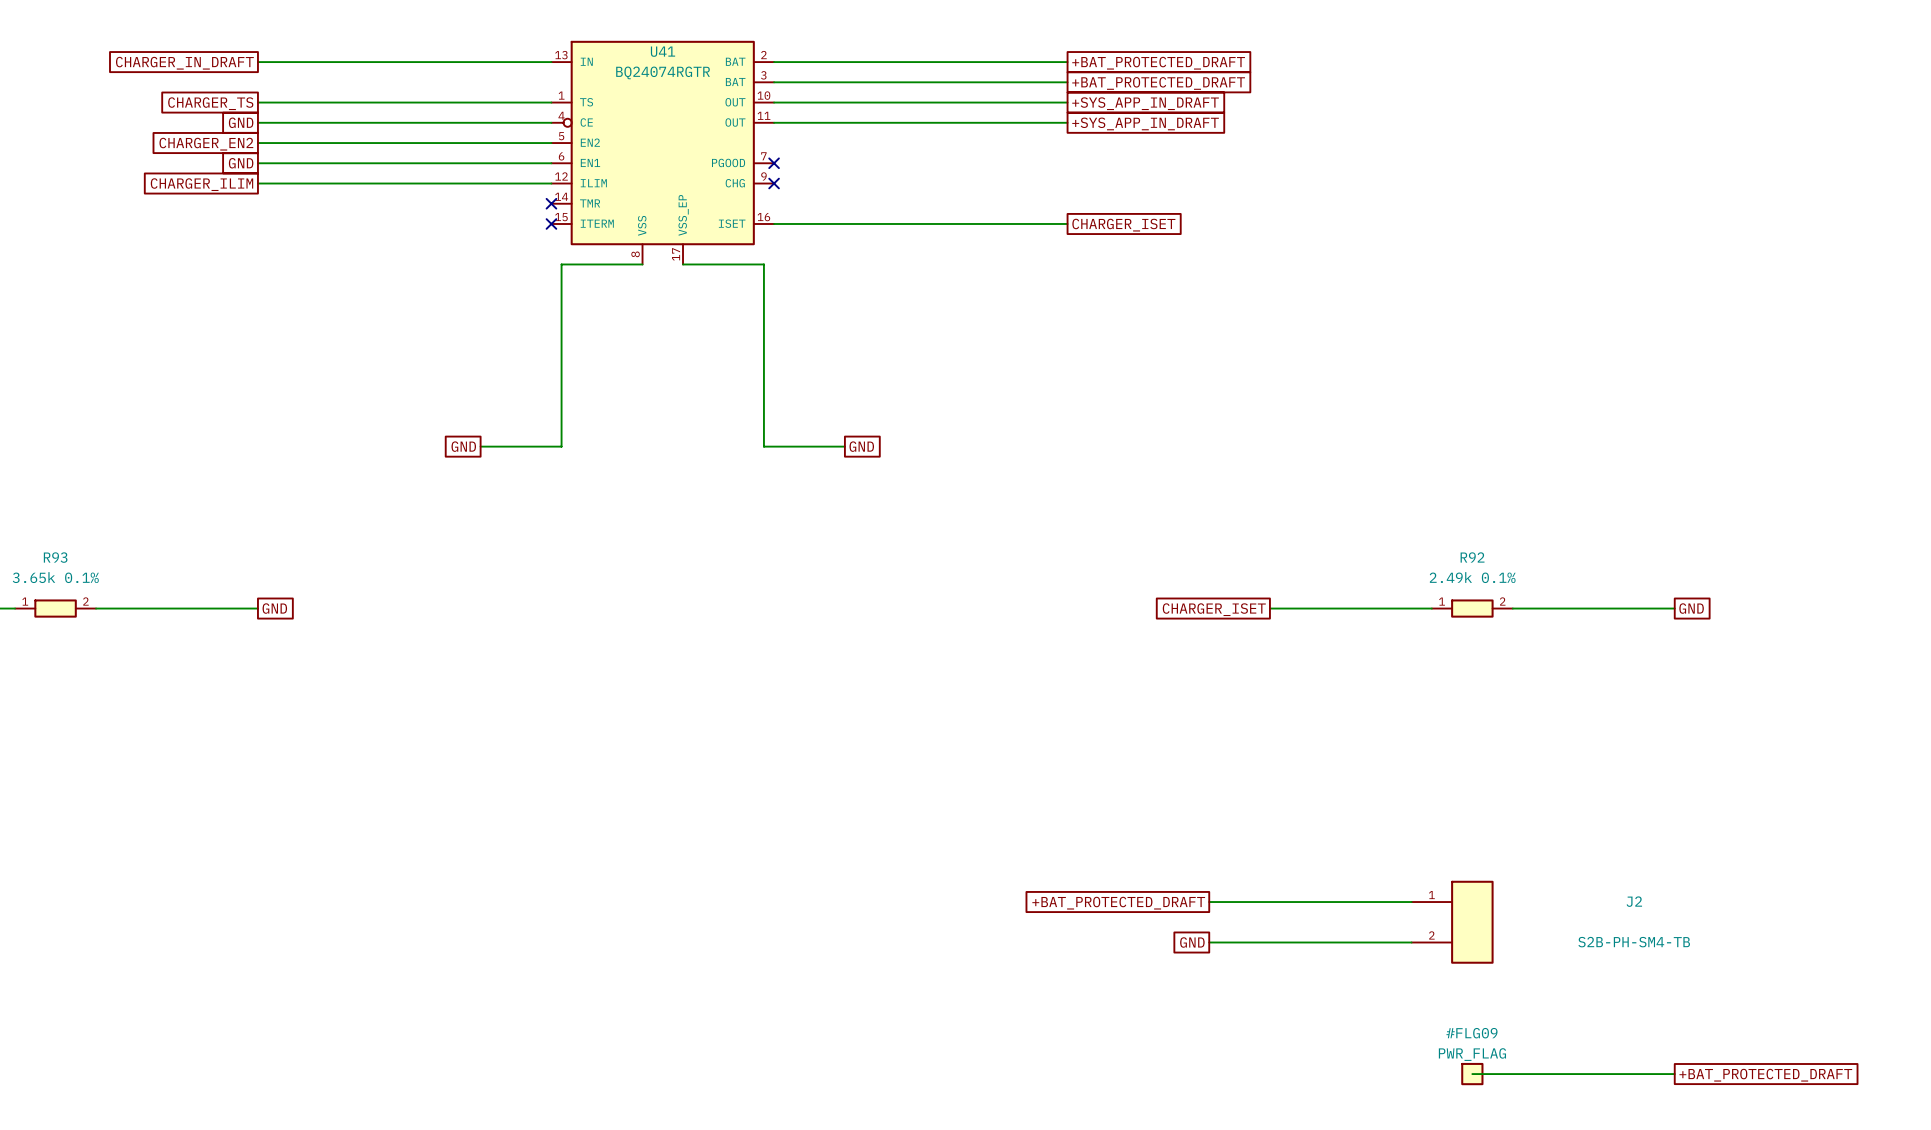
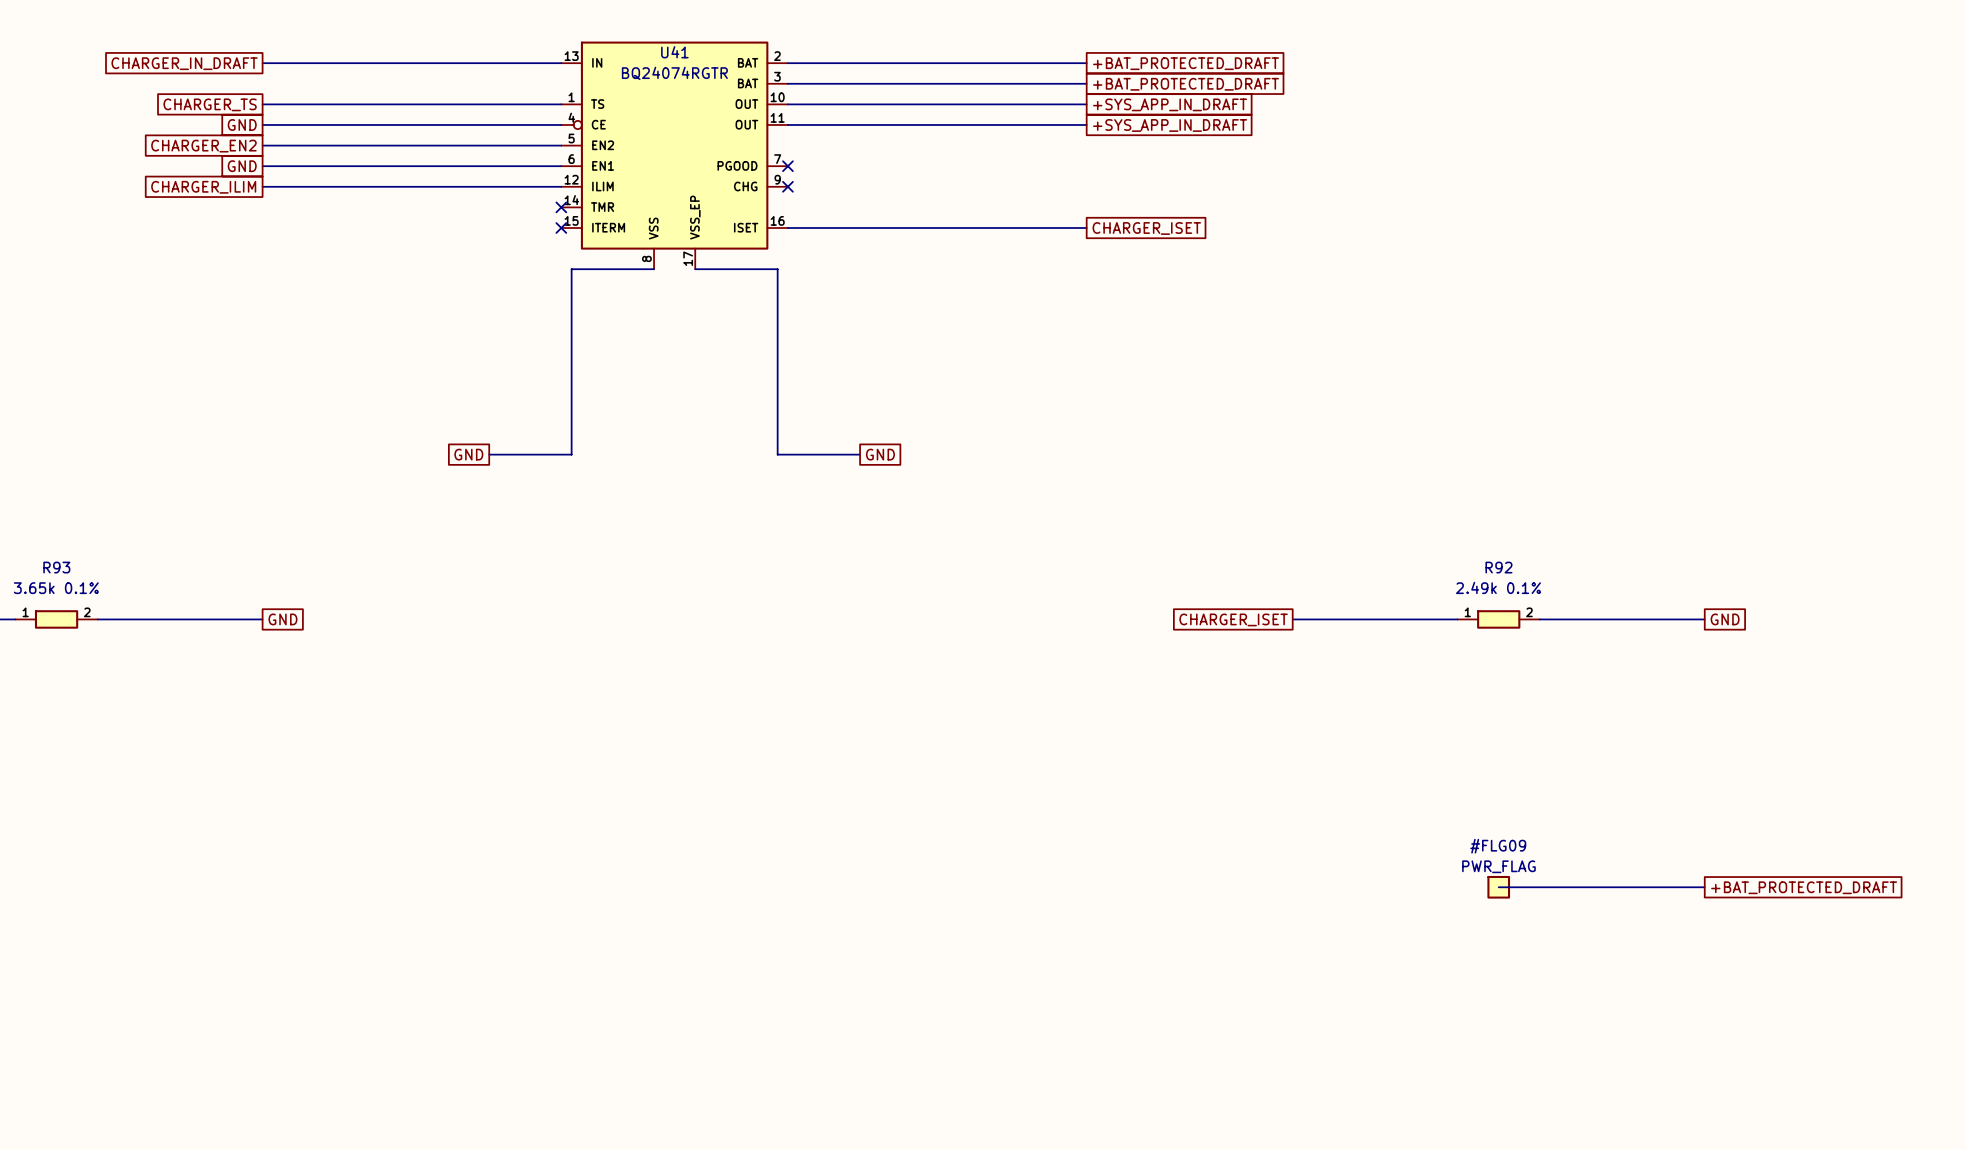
wire: none -> (1498, 887) (1704, 887)
global label: none -> +BAT_PROTECTED_DRAFT (1804, 887)
wire: (1209, 902) (1411, 902) -> none
global label: +BAT_PROTECTED_DRAFT (1118, 903) -> none
J2: S2B-PH-SM4-TB (1452, 922) -> none
global label: GND (1192, 942) -> none
wire: (1209, 942) (1411, 942) -> none
wire: (1472, 1074) (1674, 1074) -> none
#FLG09 position: PWR_FLAG (1472, 1074) -> PWR_FLAG (1498, 887)
global label: +BAT_PROTECTED_DRAFT (1765, 1075) -> none

